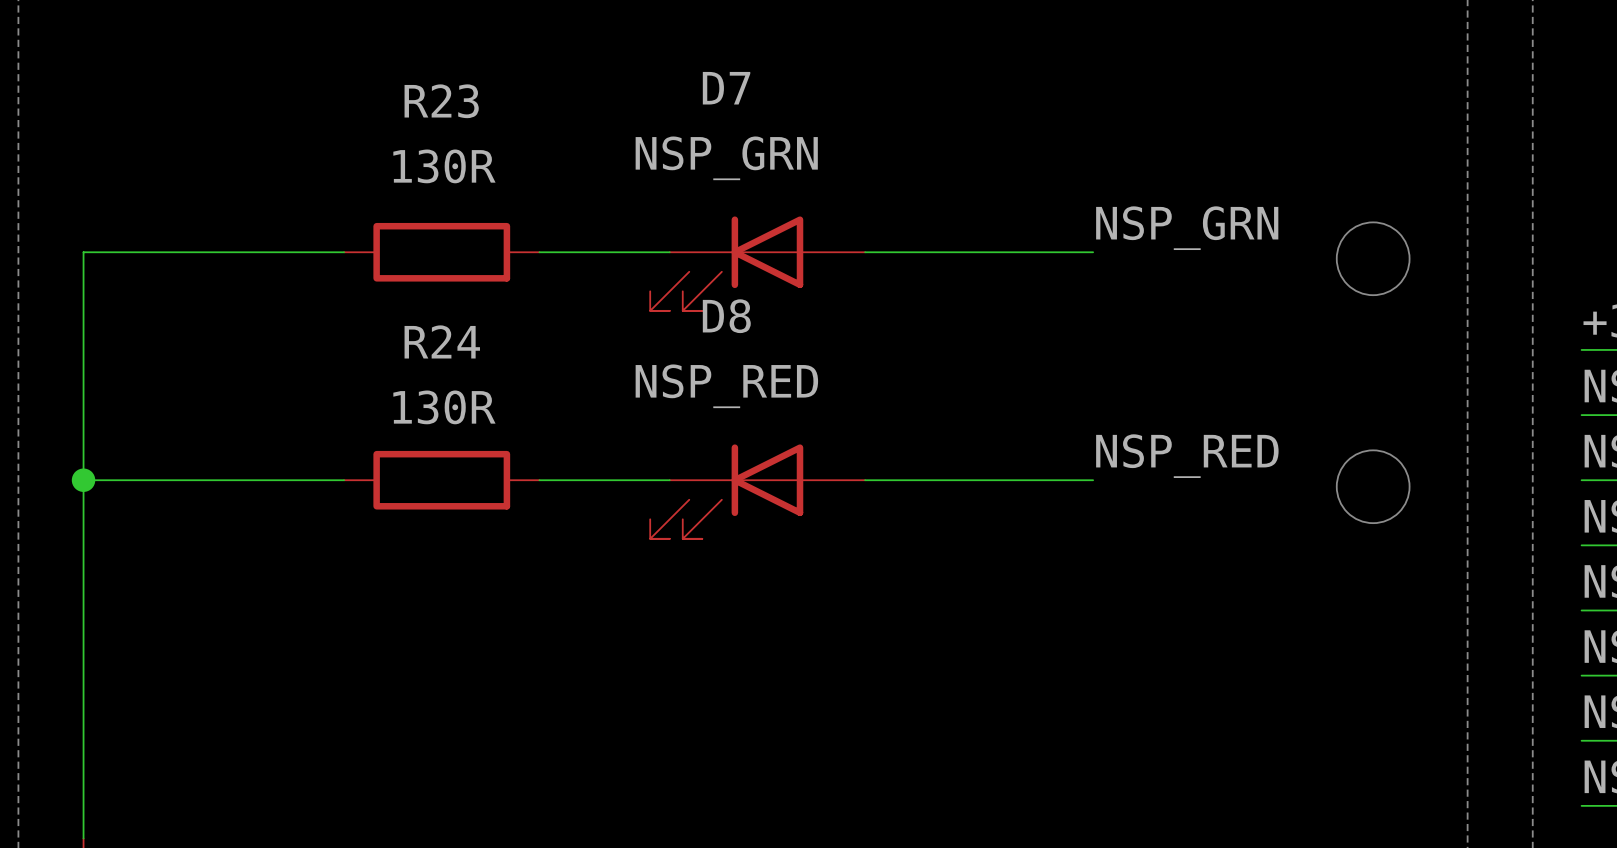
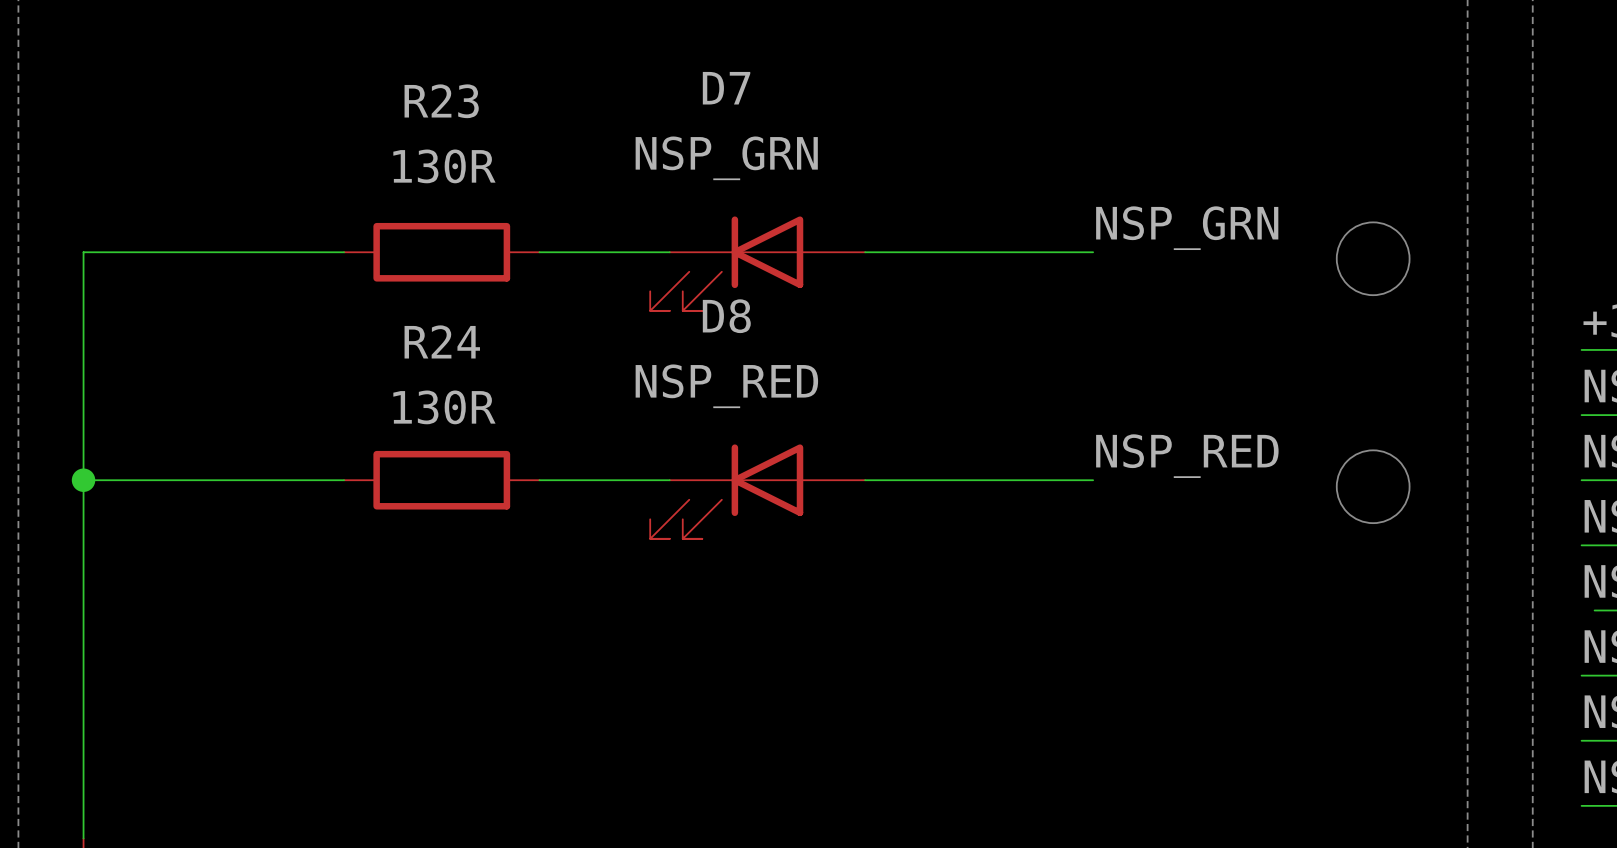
wire: (1581, 610) (1594, 610) -> none

